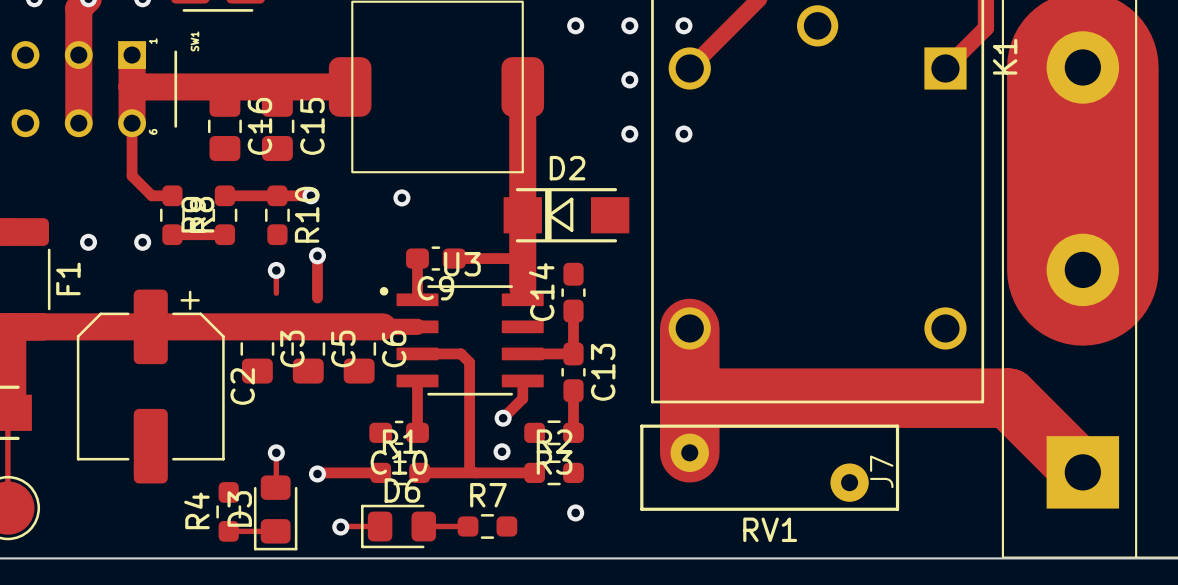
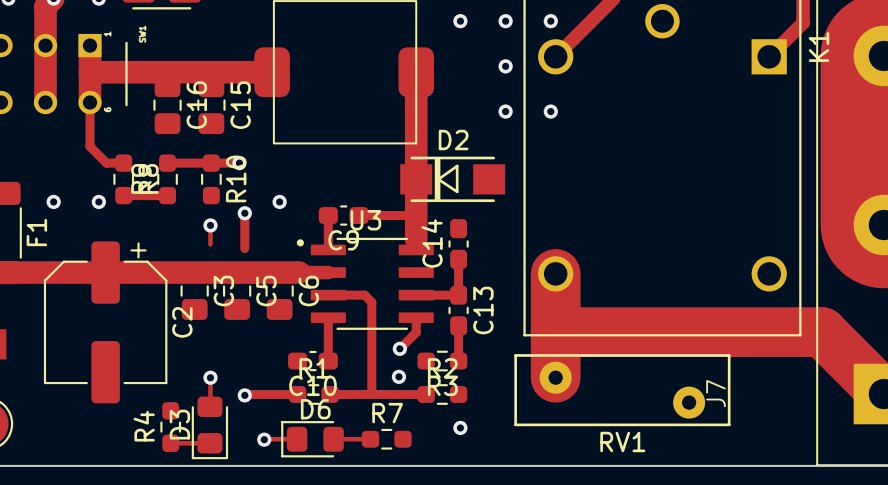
via position: (401, 197) -> (279, 201)

